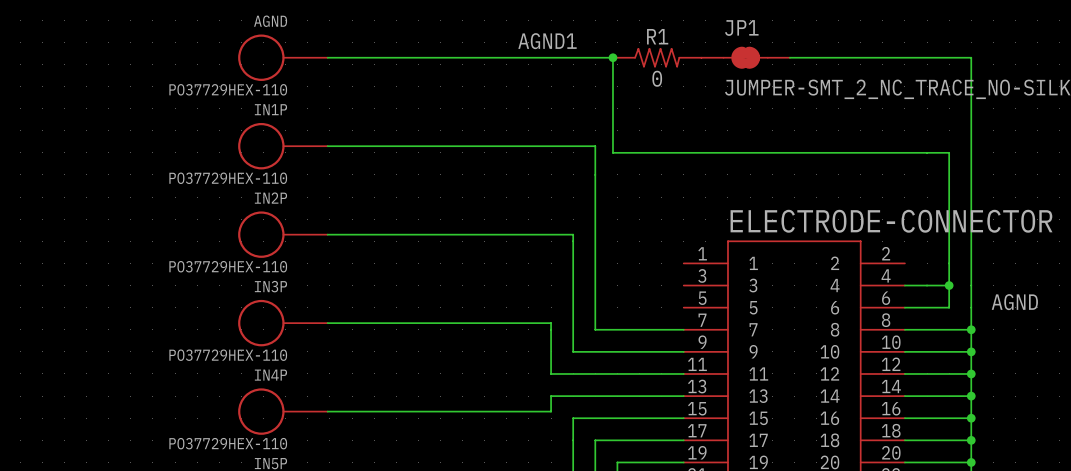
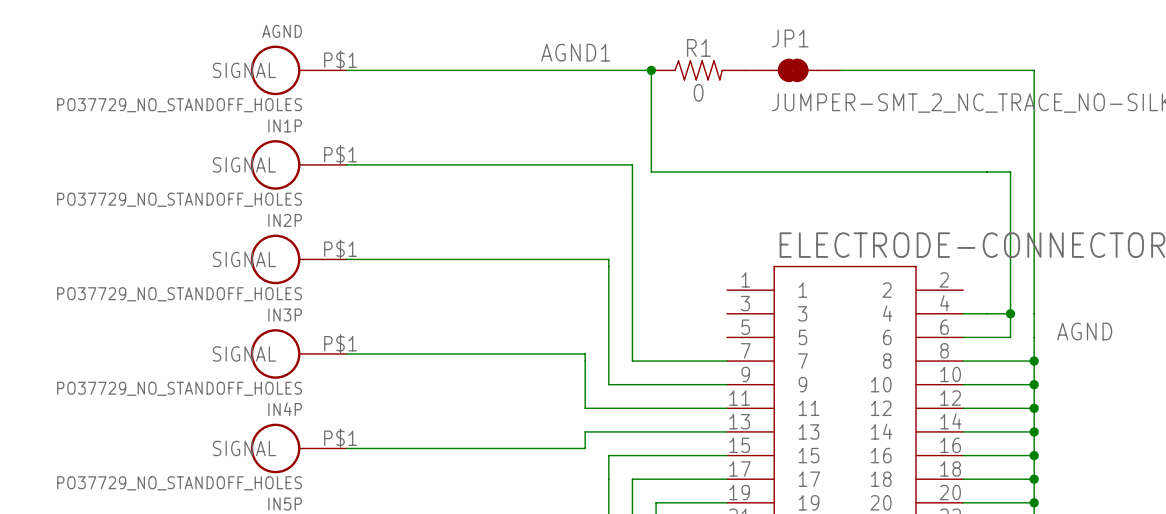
AGND pin number: none -> P$1 (340, 60)
AGND pin name: none -> SIGNAL (244, 70)
AGND value: PO37729HEX-110 (228, 89) -> PO37729_NO_STANDOFF_HOLES (179, 105)
IN1P pin number: none -> P$1 (340, 154)
IN1P pin name: none -> SIGNAL (244, 164)
IN1P value: PO37729HEX-110 (228, 178) -> PO37729_NO_STANDOFF_HOLES (179, 199)
IN2P pin number: none -> P$1 (340, 249)
IN2P pin name: none -> SIGNAL (244, 259)
IN2P value: PO37729HEX-110 (228, 266) -> PO37729_NO_STANDOFF_HOLES (179, 294)
IN3P pin number: none -> P$1 (340, 343)
IN3P pin name: none -> SIGNAL (244, 353)
IN3P value: PO37729HEX-110 (228, 355) -> PO37729_NO_STANDOFF_HOLES (179, 388)
IN4P pin number: none -> P$1 (340, 438)
IN4P pin name: none -> SIGNAL (244, 448)
IN4P value: PO37729HEX-110 (228, 443) -> PO37729_NO_STANDOFF_HOLES (179, 483)

